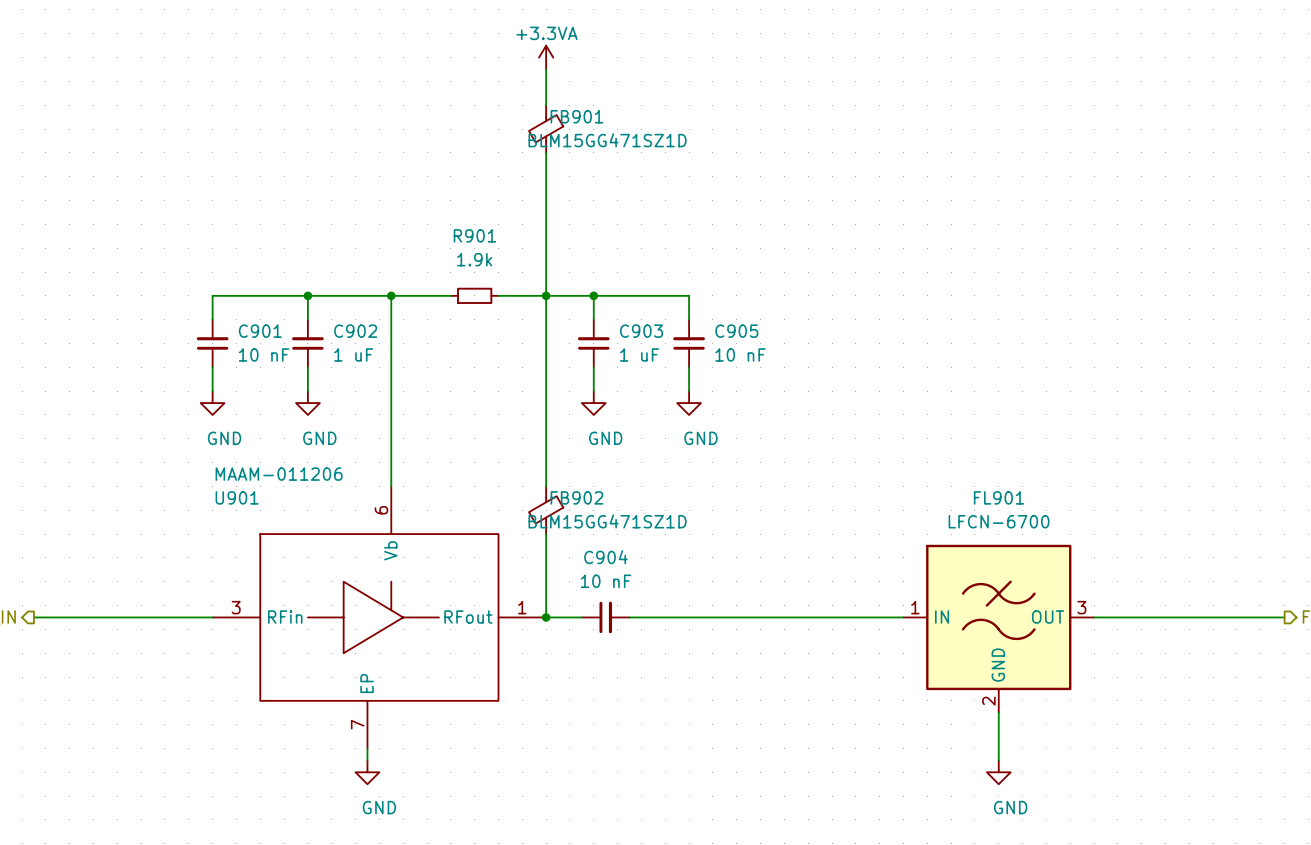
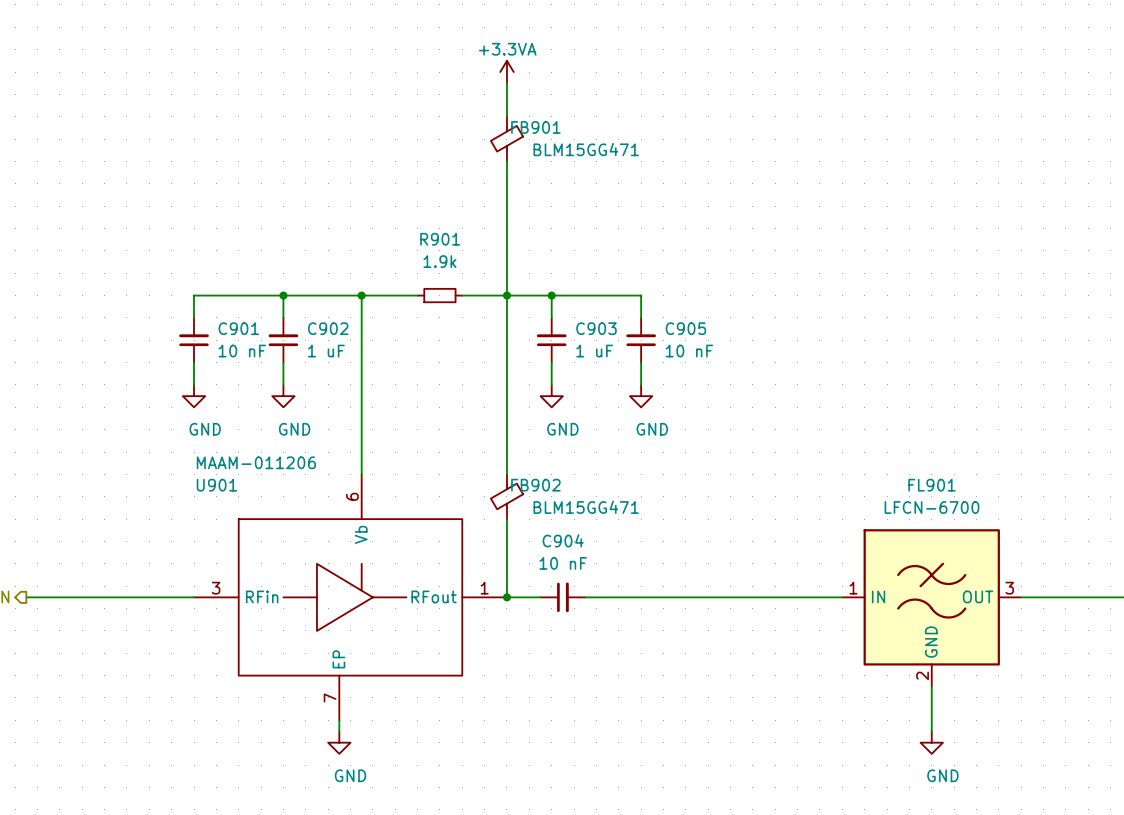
FB901 value: BLM15GG471SZ1D (607, 140) -> BLM15GG471 (586, 149)
FB902 value: BLM15GG471SZ1D (607, 521) -> BLM15GG471 (586, 507)

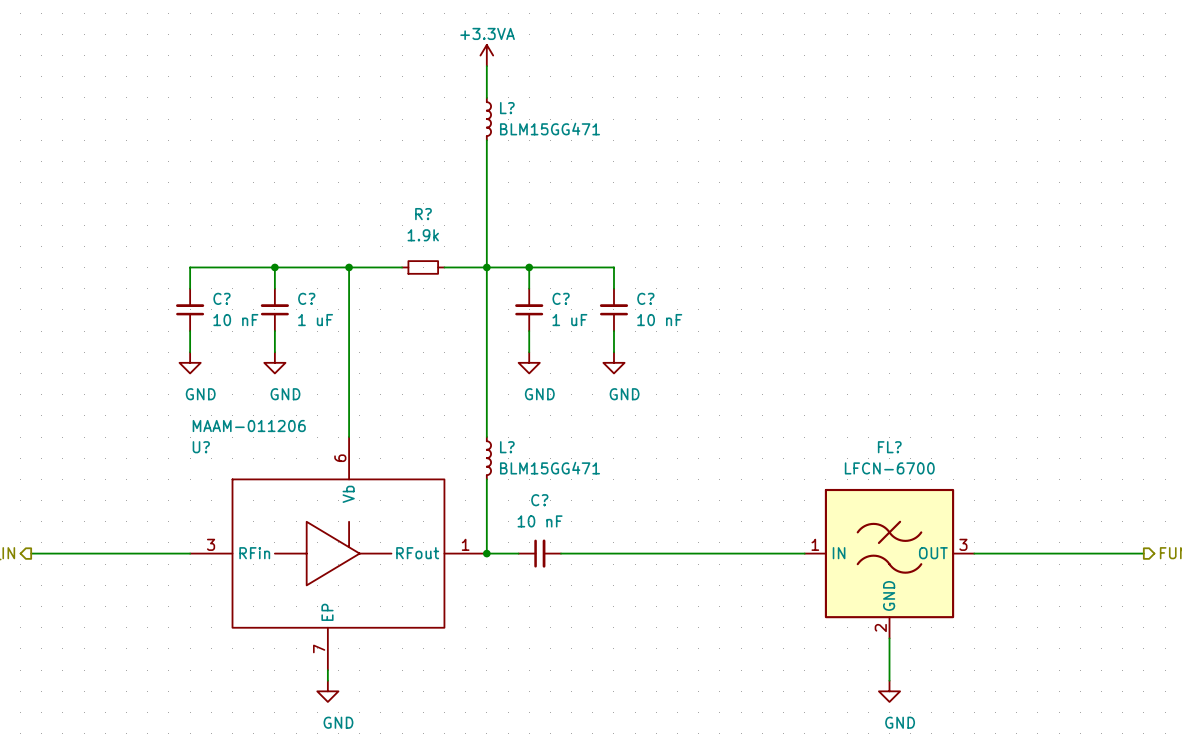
FB901: BLM15GG471 (506, 139) -> none
L?: none -> BLM15GG471 (488, 119)
R901 name: R901 (440, 239) -> R? (423, 214)
C901 name: C901 (238, 328) -> C? (221, 298)
C902 name: C902 (328, 328) -> C? (306, 298)
C903 name: C903 (596, 328) -> C? (561, 298)
C905 name: C905 (685, 328) -> C? (645, 298)
U901 name: U901 (216, 485) -> U? (201, 447)
FL901 name: FL901 (932, 485) -> FL? (889, 447)
FB902: BLM15GG471 (506, 496) -> none
L?: none -> BLM15GG471 (488, 458)
C904 name: C904 (563, 540) -> C? (539, 500)

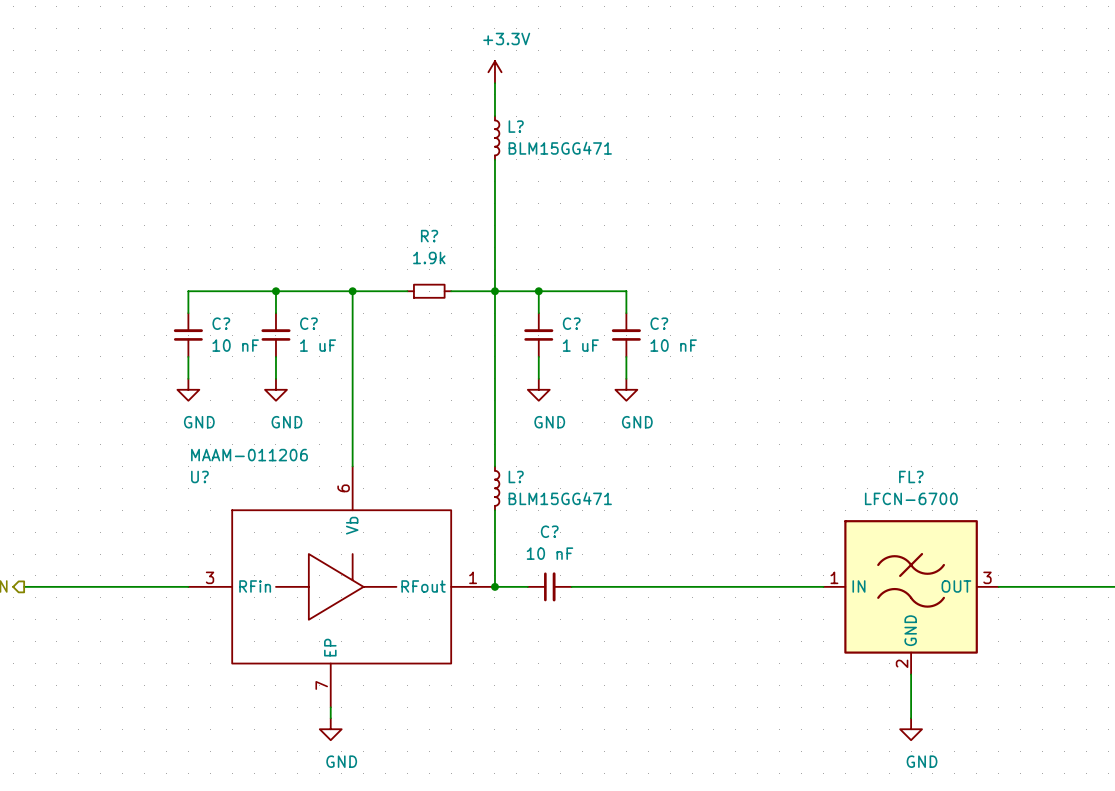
power symbol: +3.3VA (486, 55) -> +3.3V (494, 72)

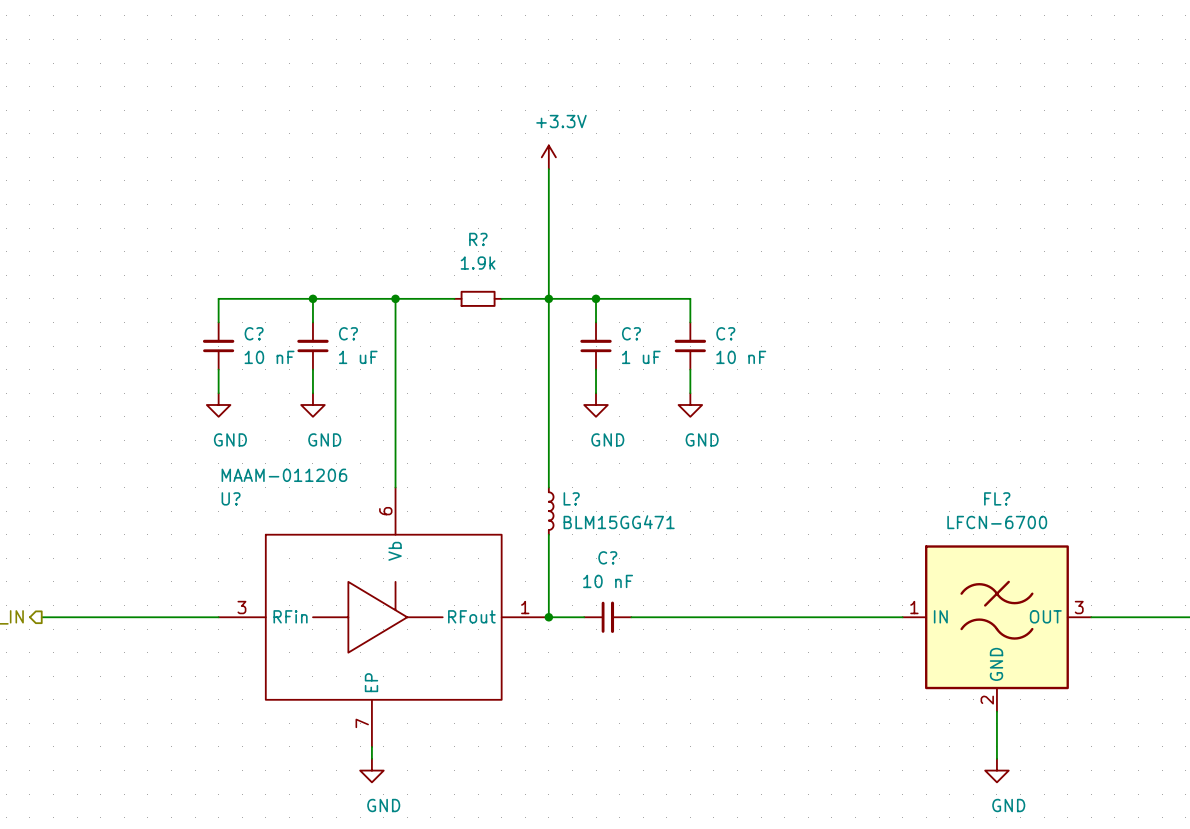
power symbol position: +3.3V (494, 72) -> +3.3V (548, 157)
wire: (494, 83) (494, 116) -> none
L?: BLM15GG471 (497, 137) -> none

